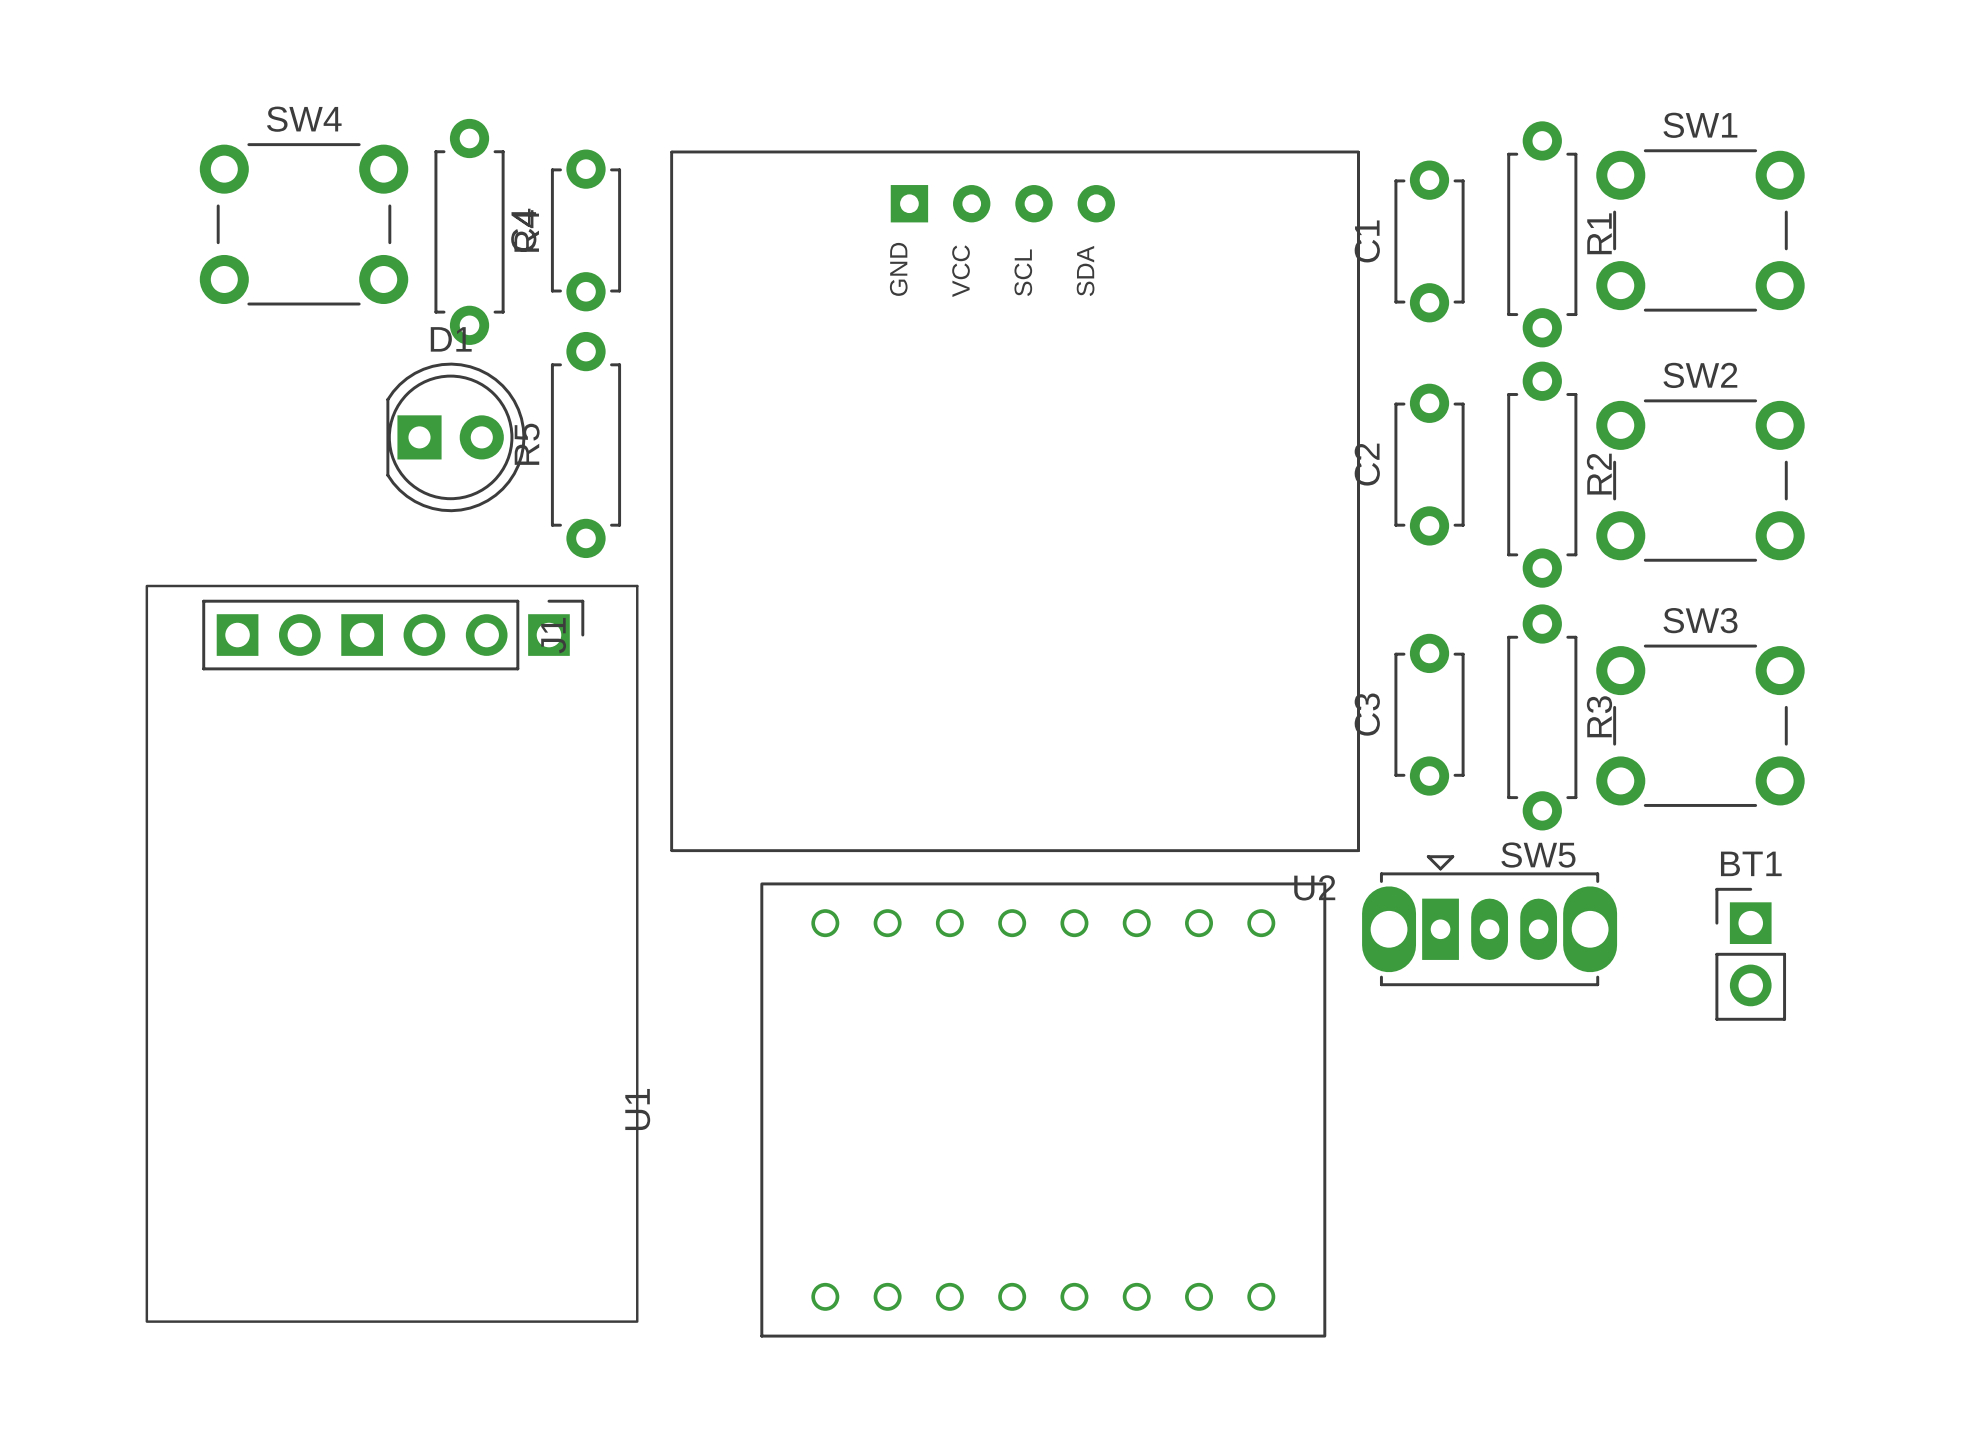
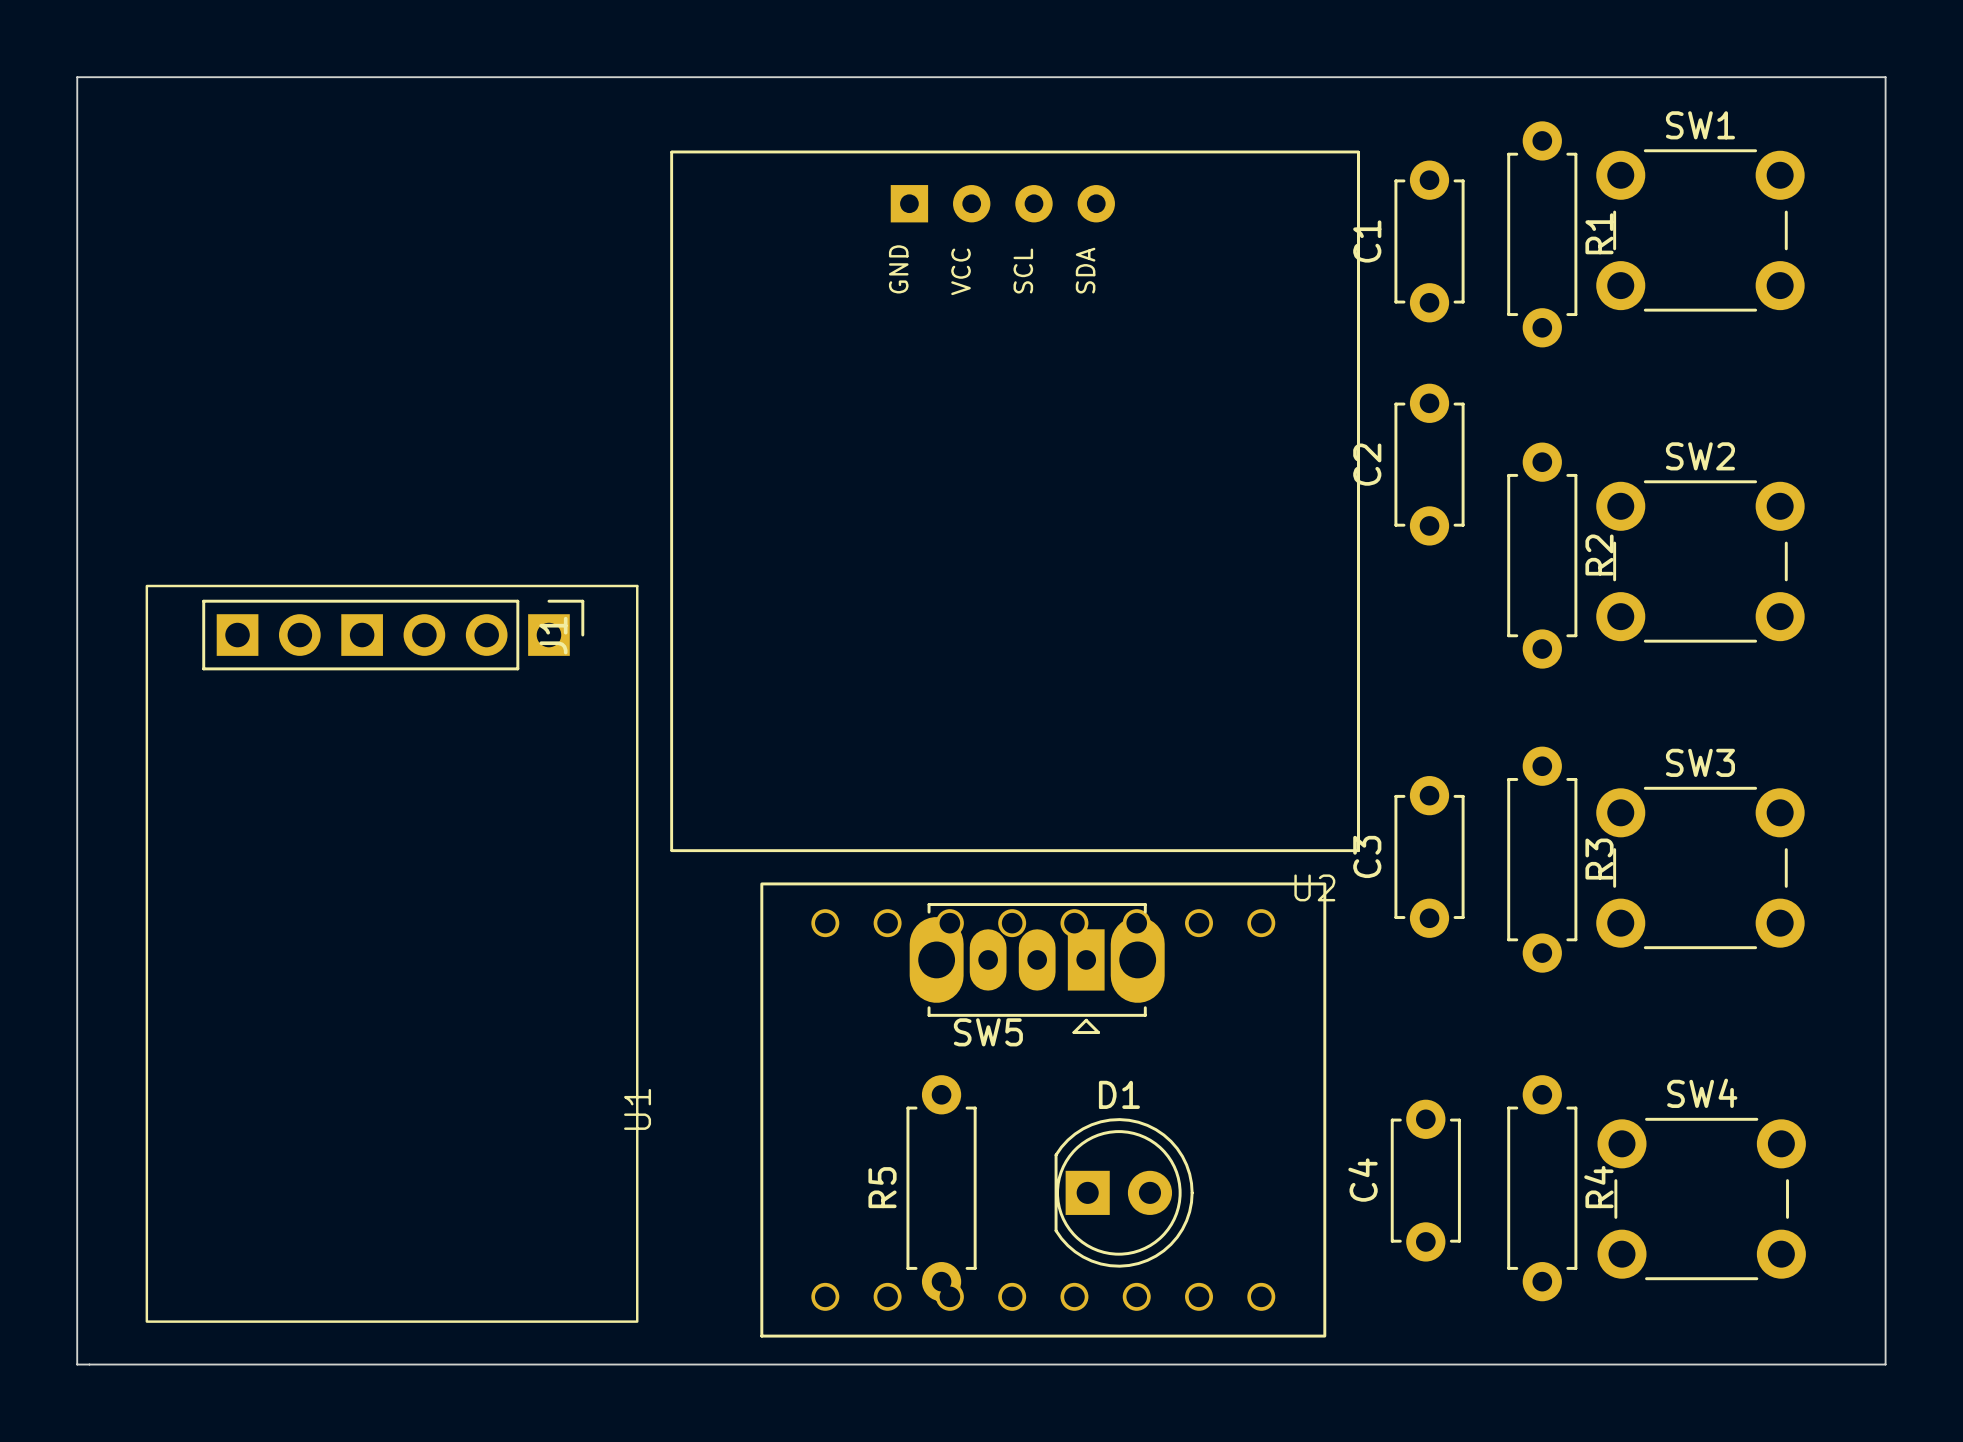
board edge: none -> (77, 77) (77, 1364) (1885, 1364) (1885, 77) (77, 77)
SW4 position: (304, 224) -> (1701, 1199)
C4 position: (586, 230) -> (1425, 1180)
R4 position: (469, 231) -> (1542, 1188)
D1 position: (455, 437) -> (1124, 1192)
R5 position: (586, 445) -> (941, 1188)
R2 position: (1542, 474) -> (1542, 555)
SW2 position: (1700, 480) -> (1700, 561)
C3 position: (1429, 714) -> (1429, 856)
R3 position: (1542, 717) -> (1542, 859)
SW3 position: (1700, 725) -> (1700, 867)
SW5 rotation: 0° (1489, 920) -> 180° (1037, 968)
SW5 position: (1489, 920) -> (1037, 968)
BT1: (1750, 954) -> none

